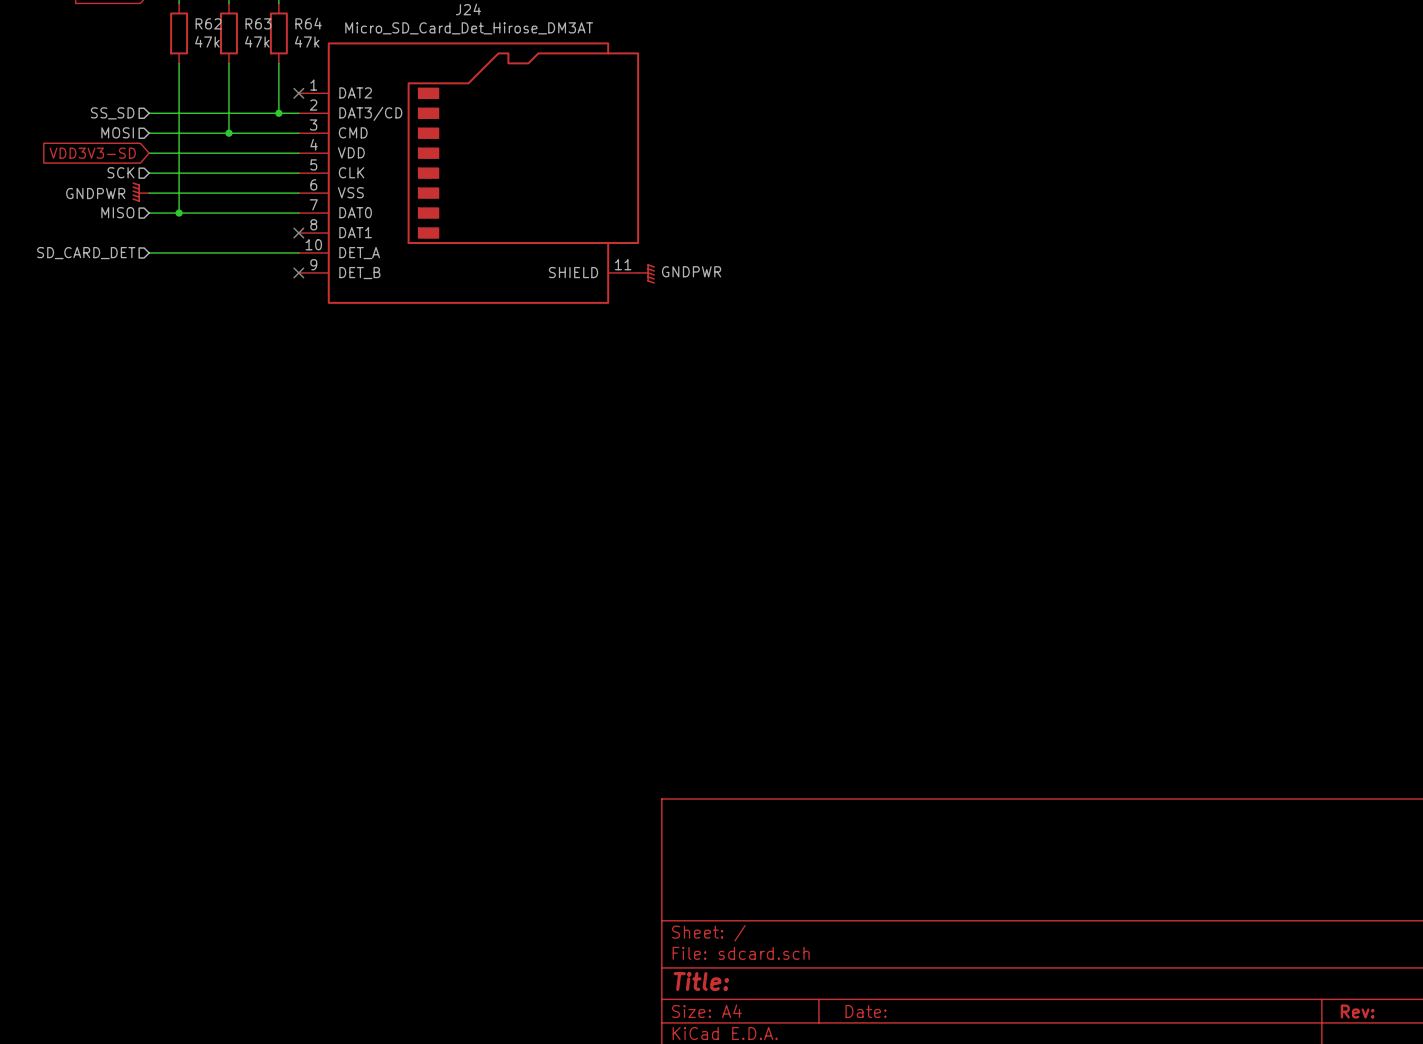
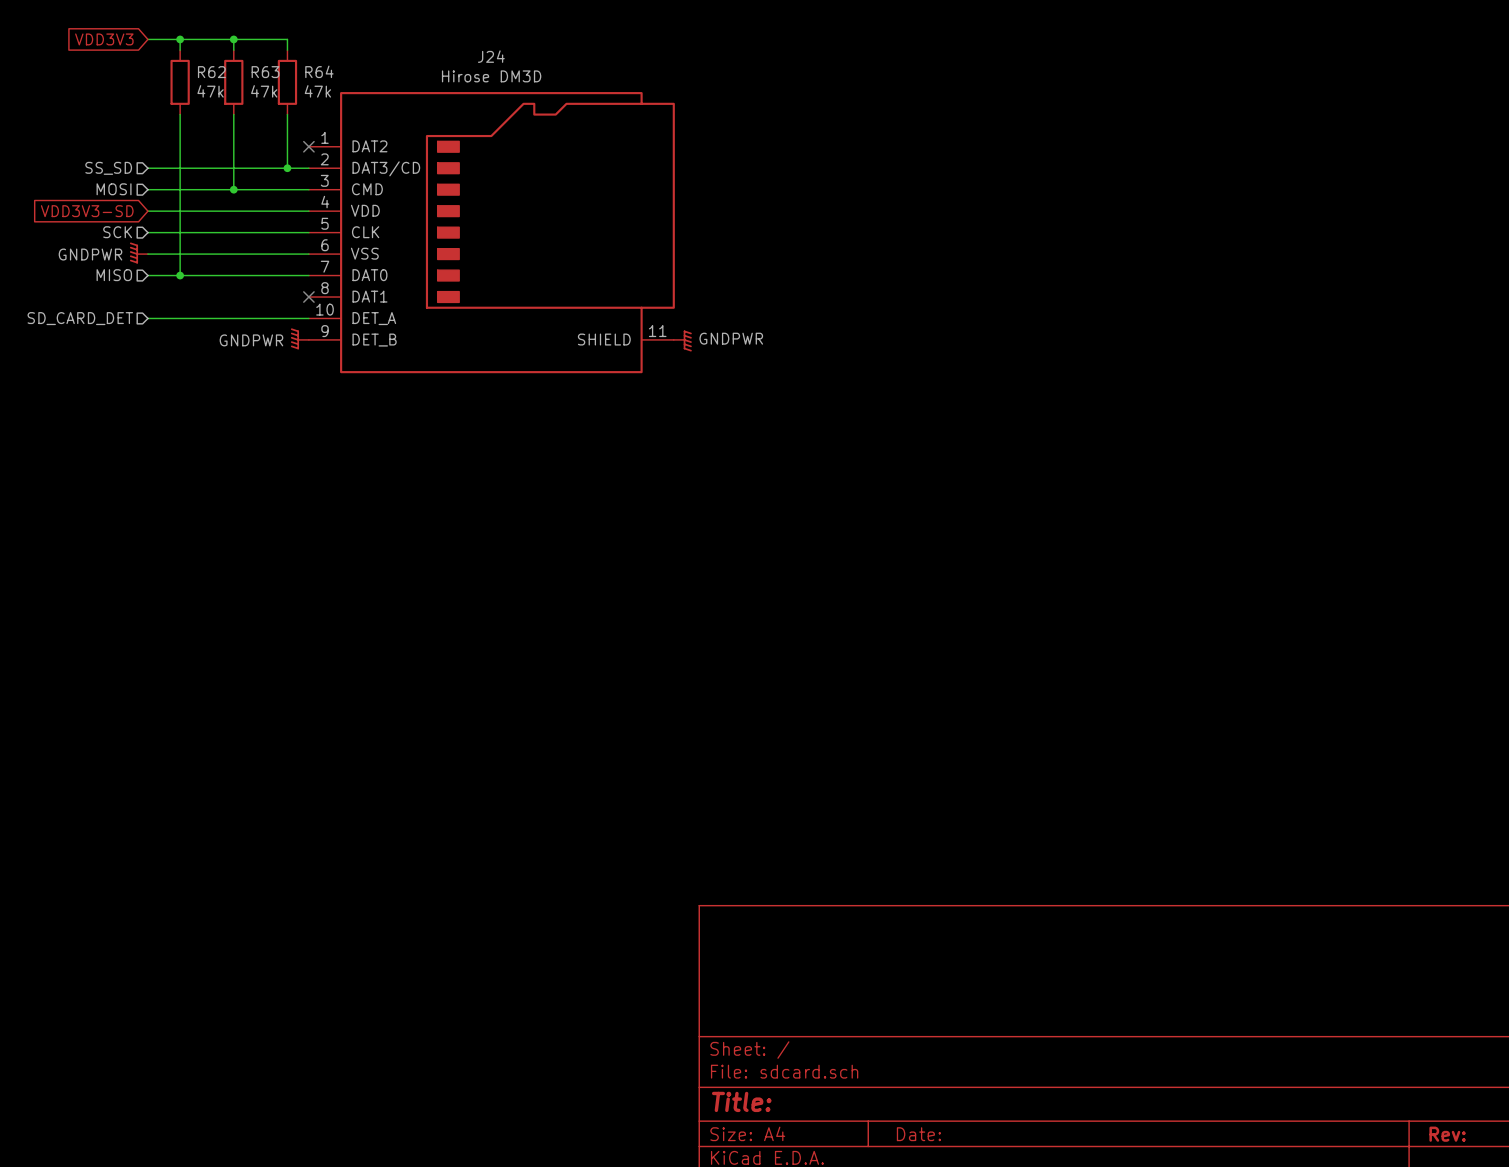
J24 value: Micro_SD_Card_Det_Hirose_DM3AT (469, 28) -> Hirose DM3D (491, 76)
power symbol: none -> GNDPWR (299, 338)
no-connect mark: (298, 272) -> none

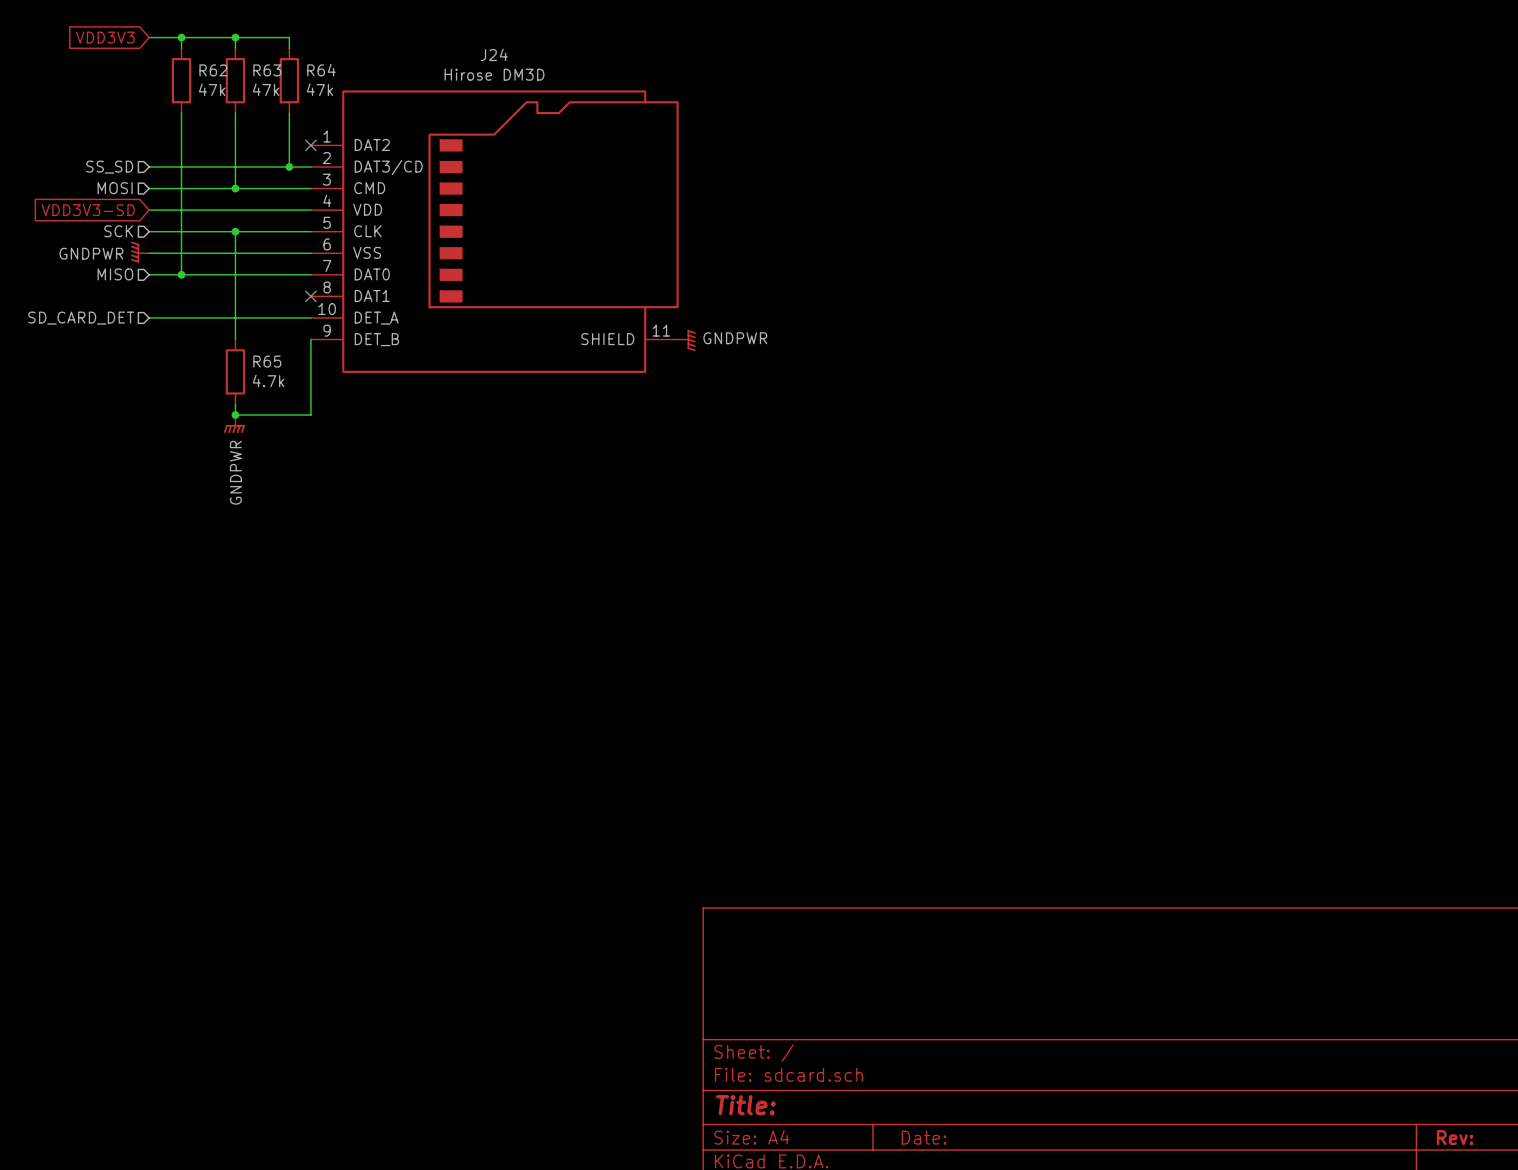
wire: none -> (235, 231) (235, 339)
junction: none -> (235, 231)
power symbol rotation: 0° (299, 338) -> 90° counterclockwise (234, 424)
power symbol position: GNDPWR (299, 338) -> GNDPWR (234, 424)
wire: none -> (310, 339) (310, 415) (235, 415) (235, 404)
R65: none -> 4.7k (235, 371)
junction: none -> (235, 415)

